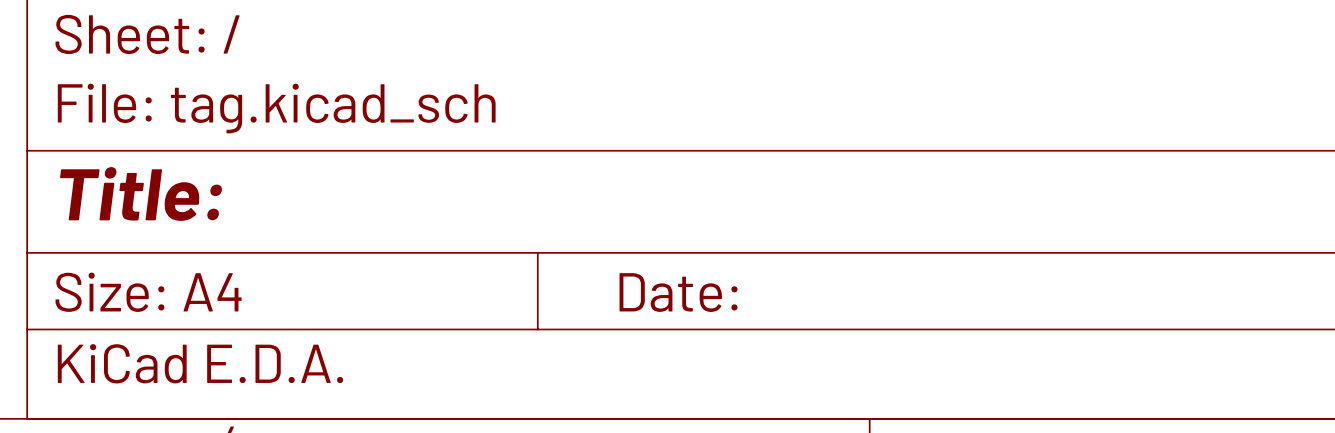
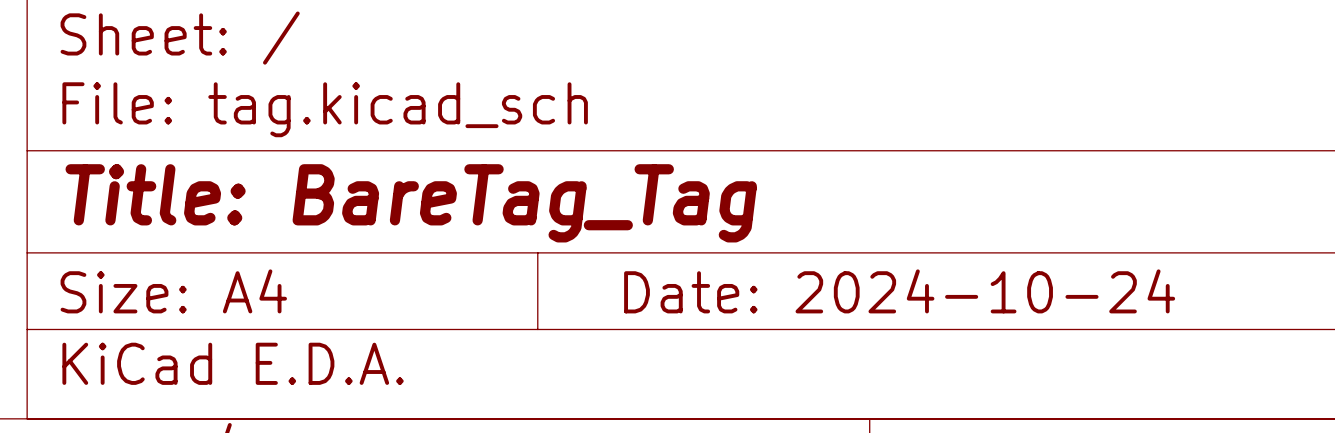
title block: Title: (141, 194) -> Title: BareTag_Tag (411, 203)
title block: Date: (678, 292) -> Date: 2024-10-24 (899, 291)

